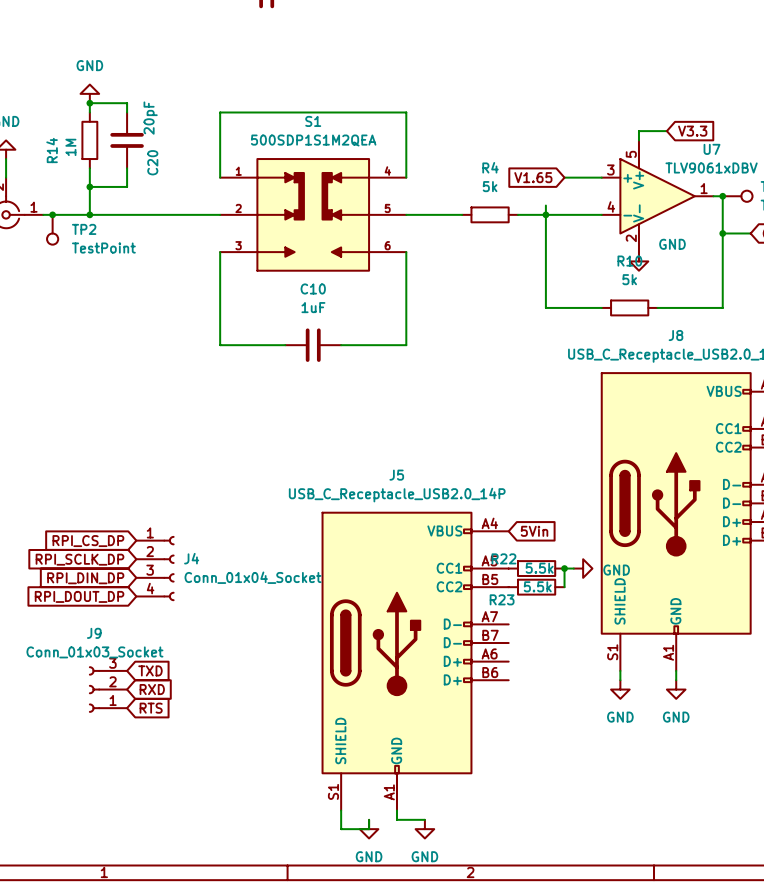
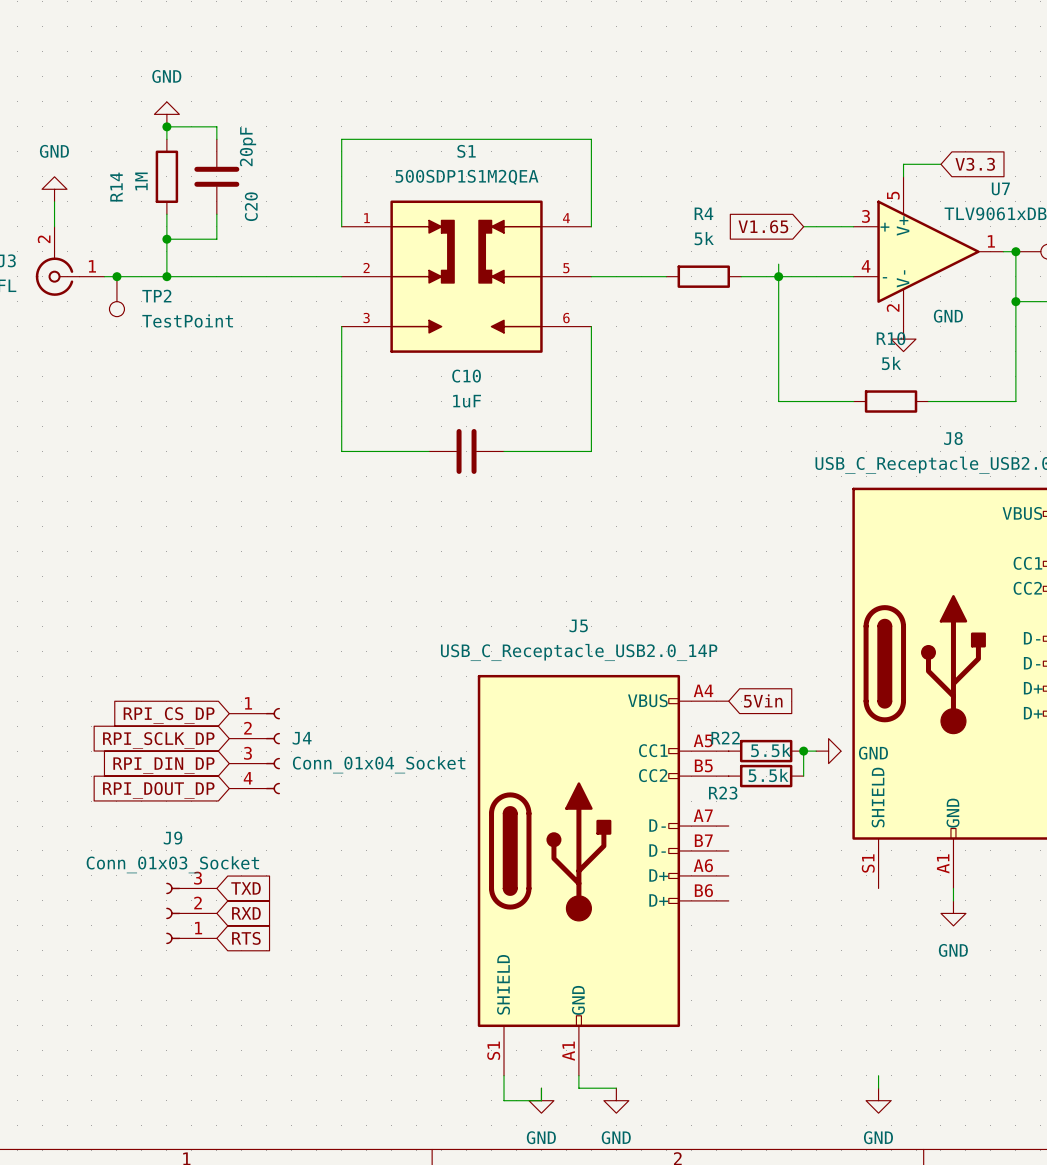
wire: (620, 670) (620, 680) -> (878, 1075) (878, 1088)
power symbol position: GND (620, 689) -> GND (878, 1100)

